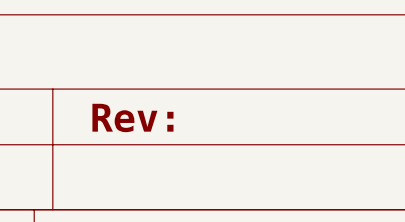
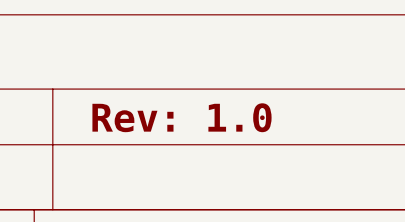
title block: Rev: (132, 117) -> Rev: 1.0 (182, 117)

